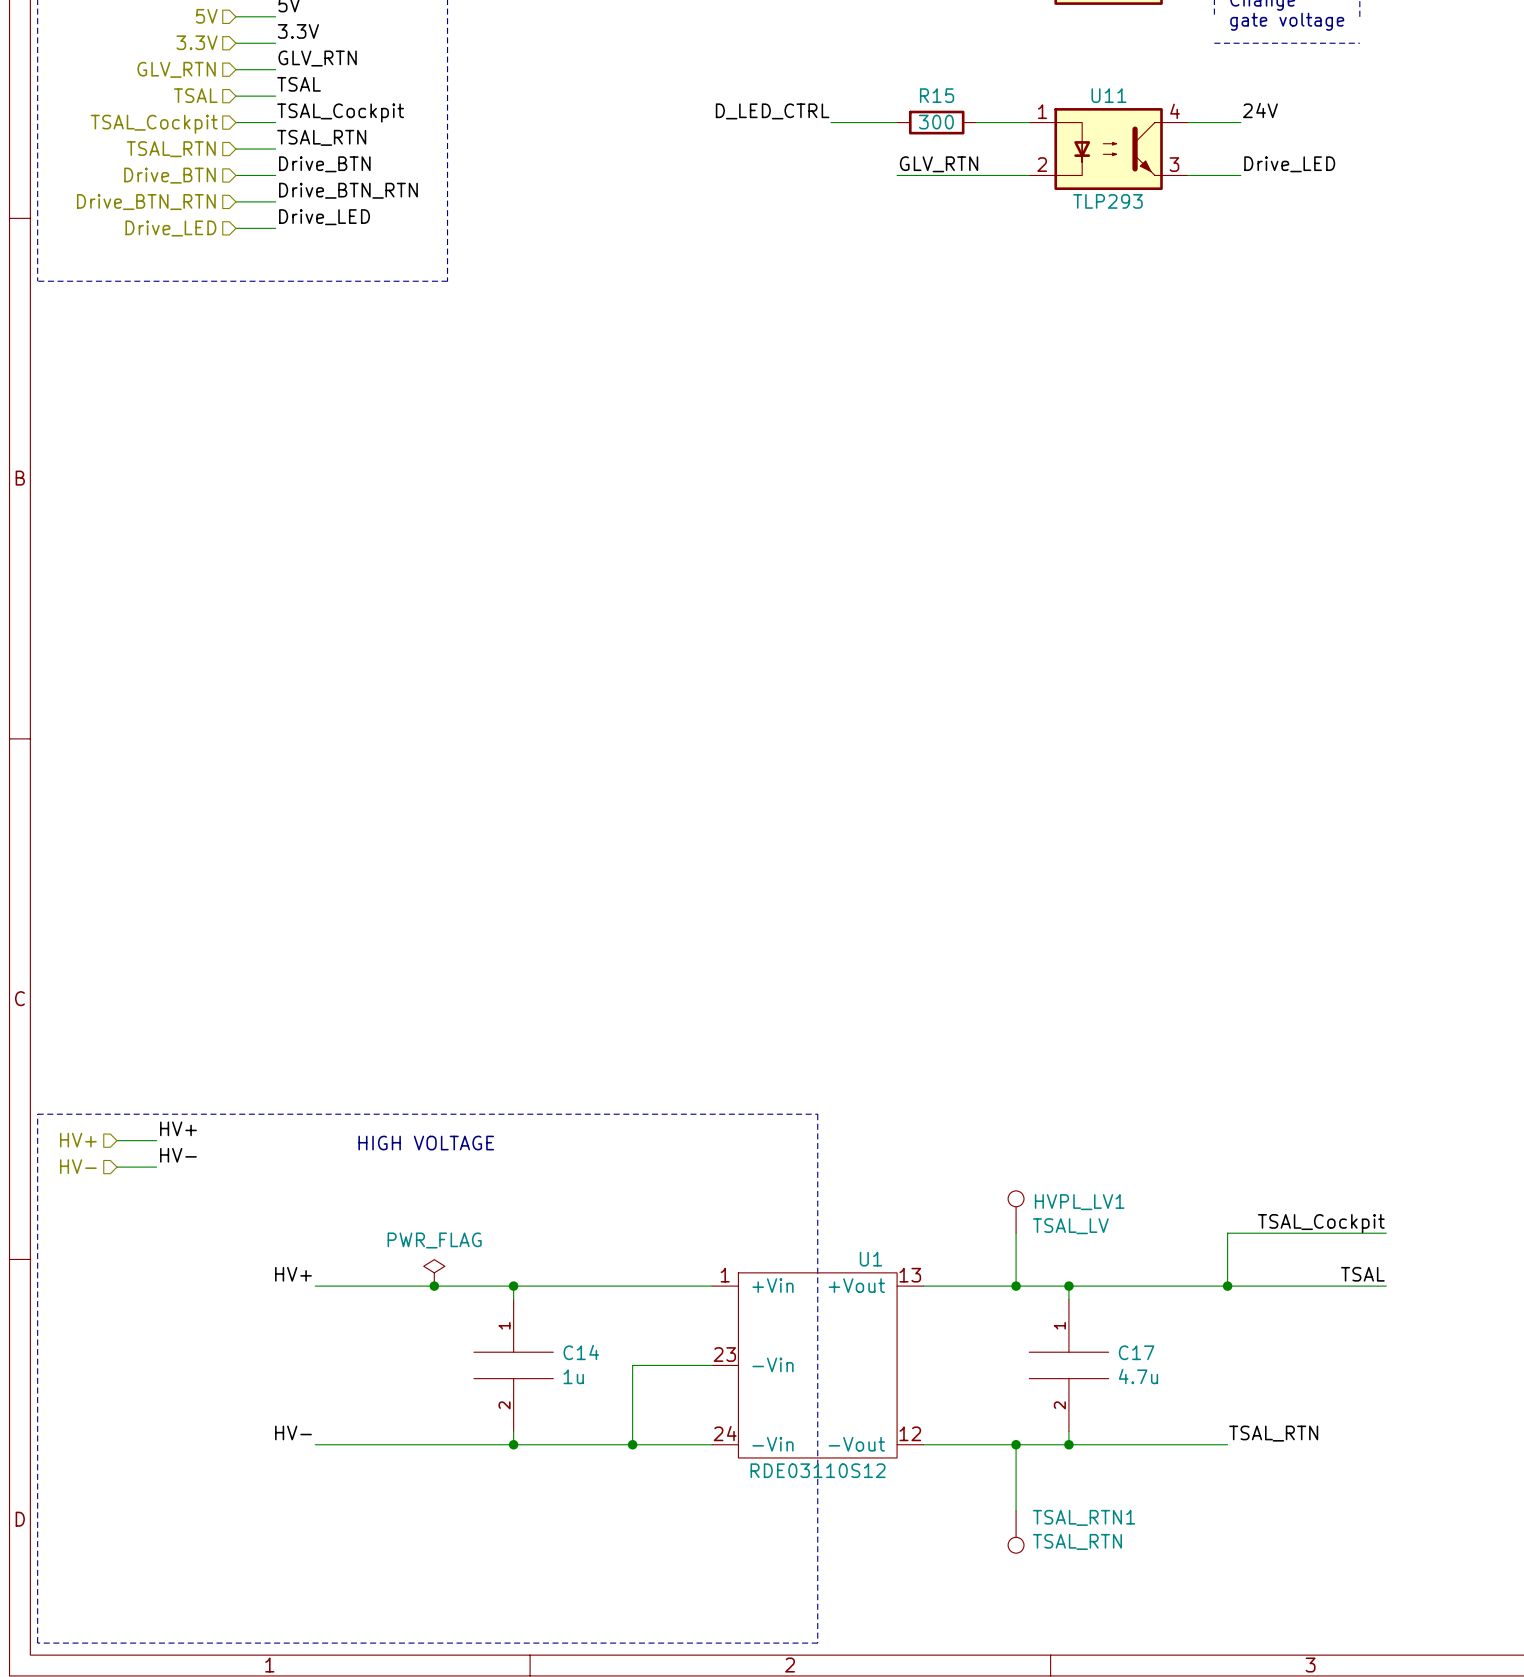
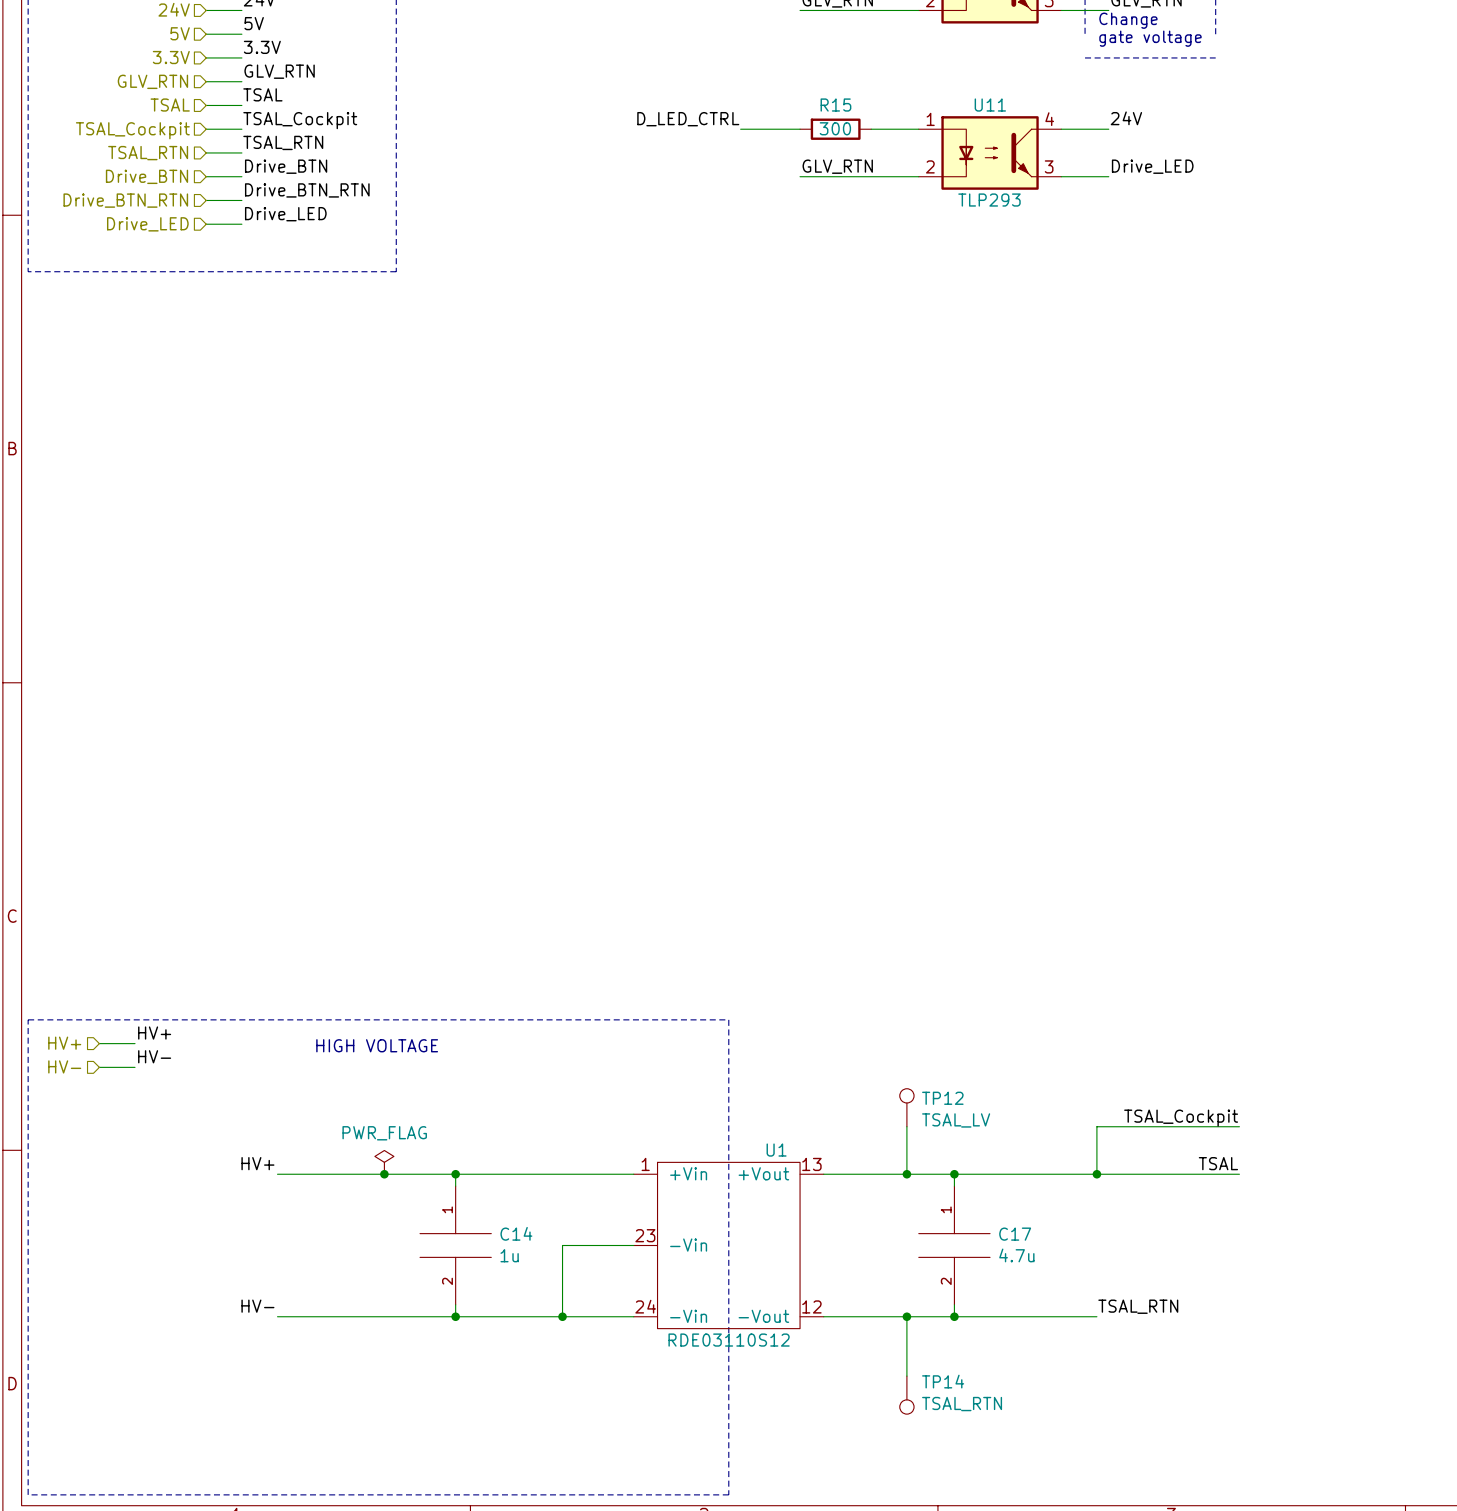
HVPL_LV1 name: HVPL_LV1 (1079, 1202) -> TP12 (942, 1098)
TSAL_RTN1 name: TSAL_RTN1 (1084, 1517) -> TP14 (943, 1381)

